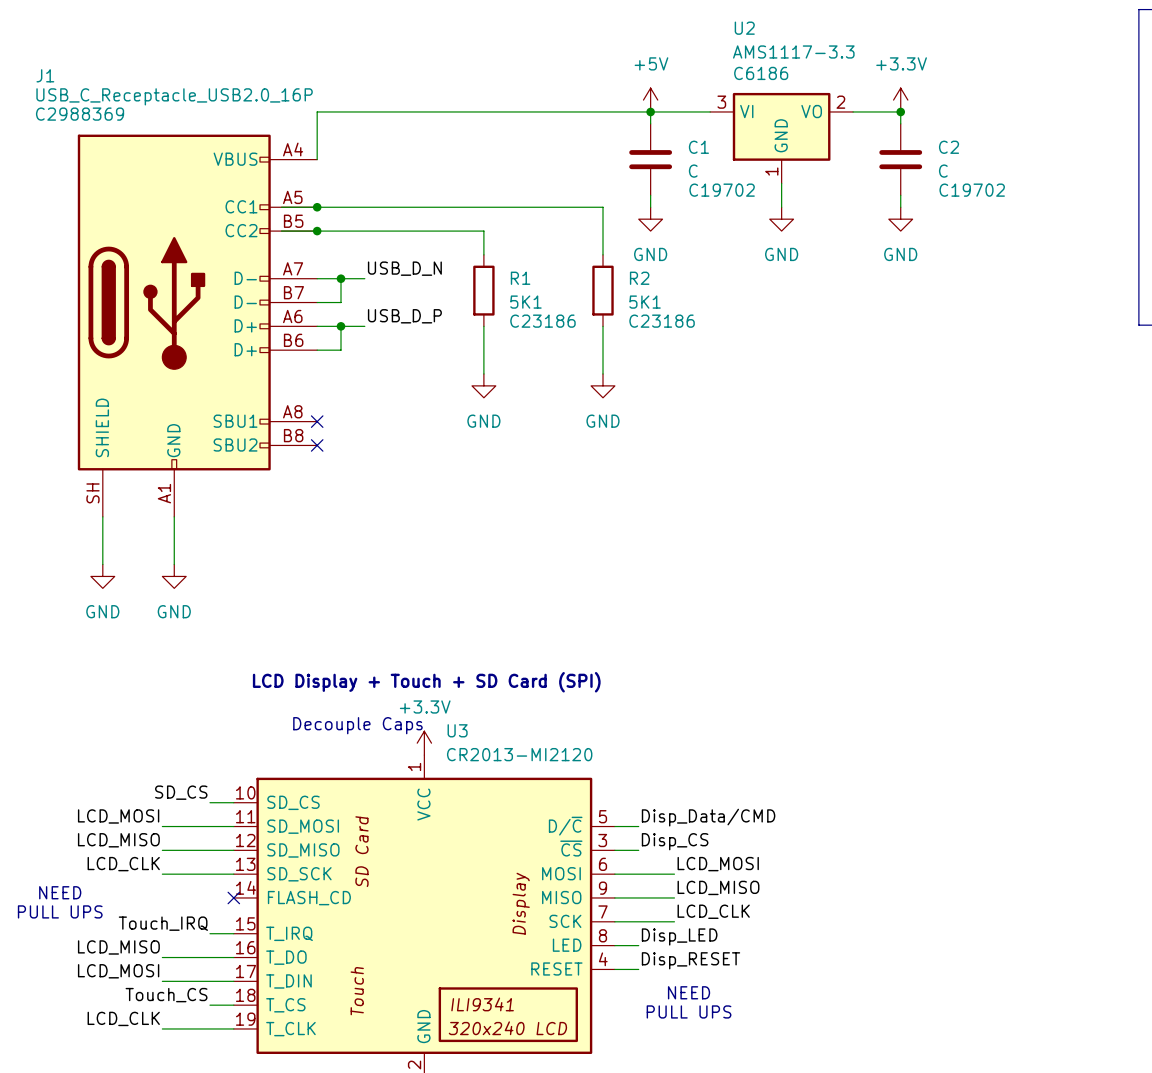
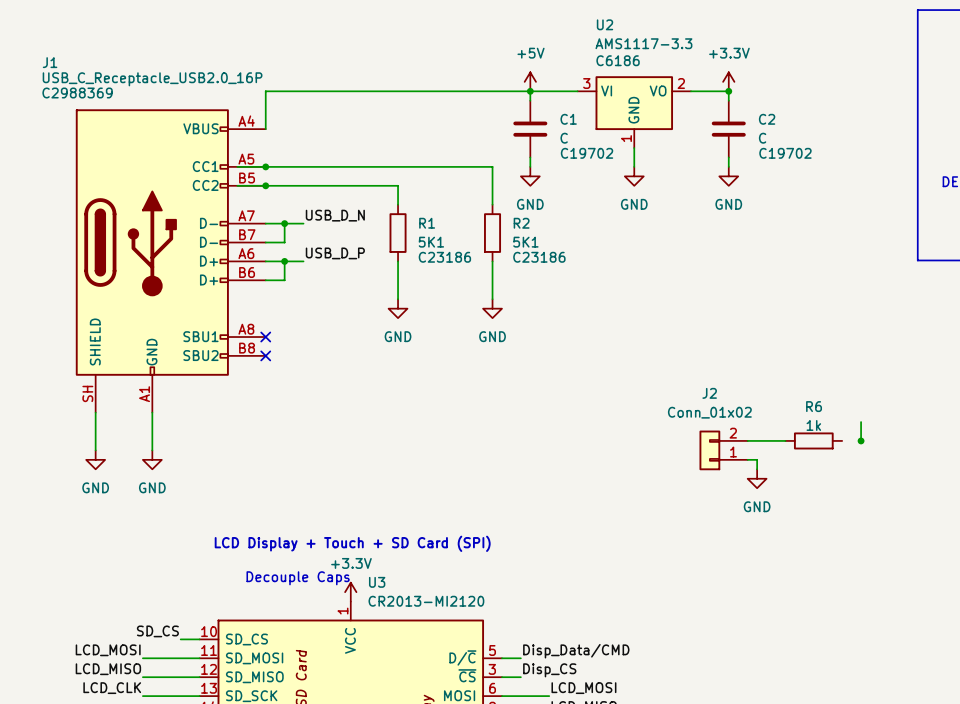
wire: none -> (861, 422) (861, 440)
wire: none -> (747, 440) (785, 440)
R6: none -> 1k (813, 440)
junction: none -> (861, 440)
J2: none -> Conn_01x02 (723, 450)
wire: none -> (747, 459) (757, 459) (757, 469)
power symbol: none -> GND (757, 478)

